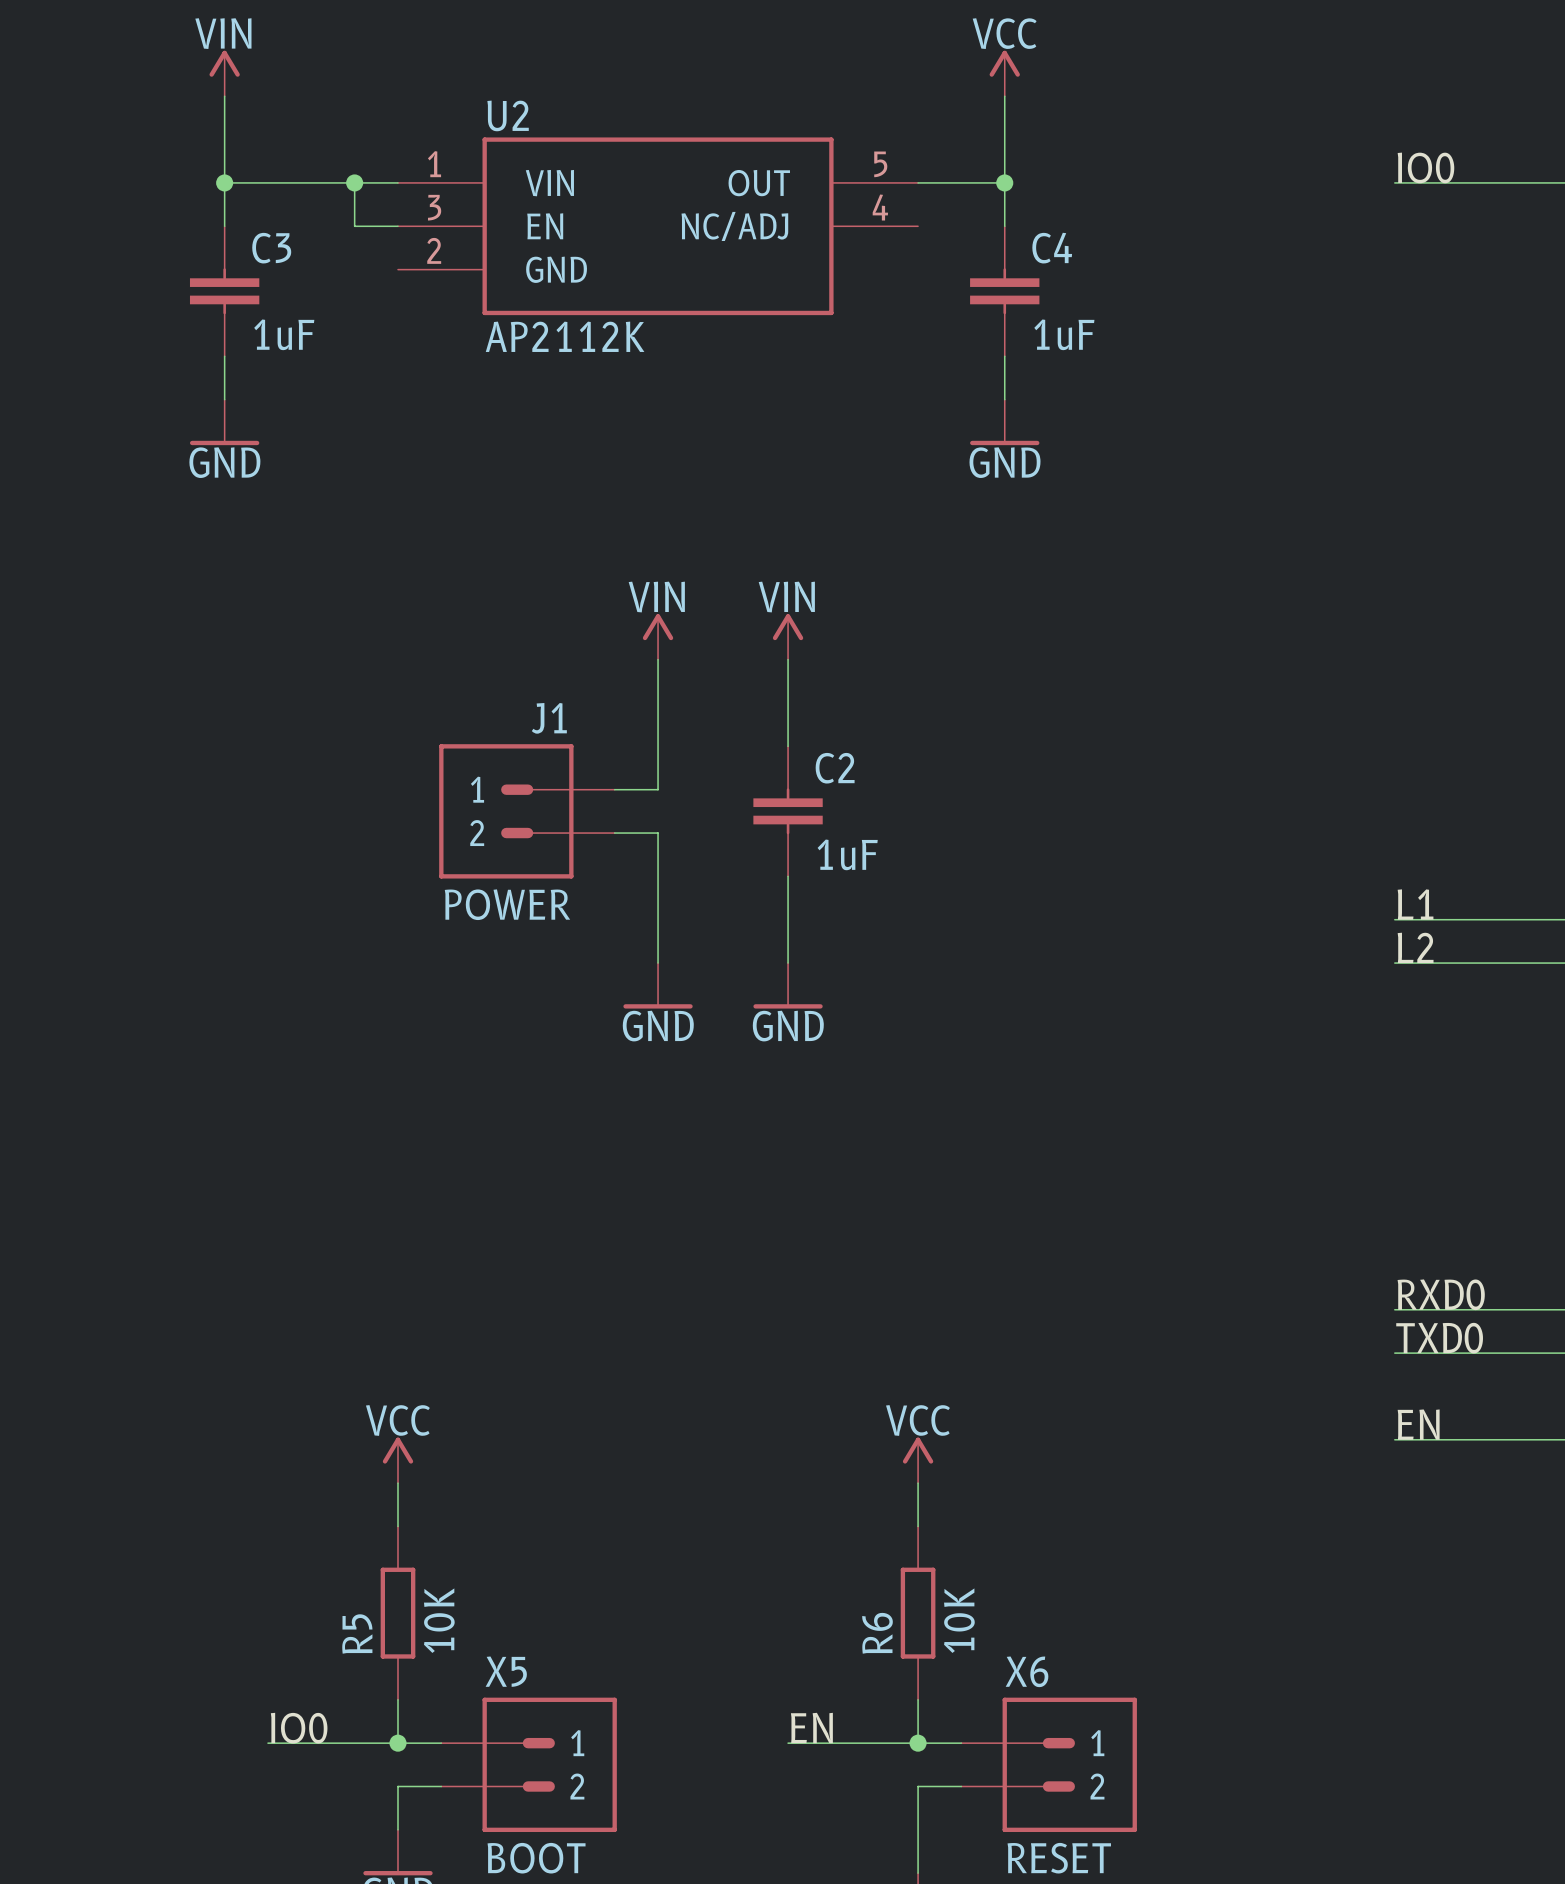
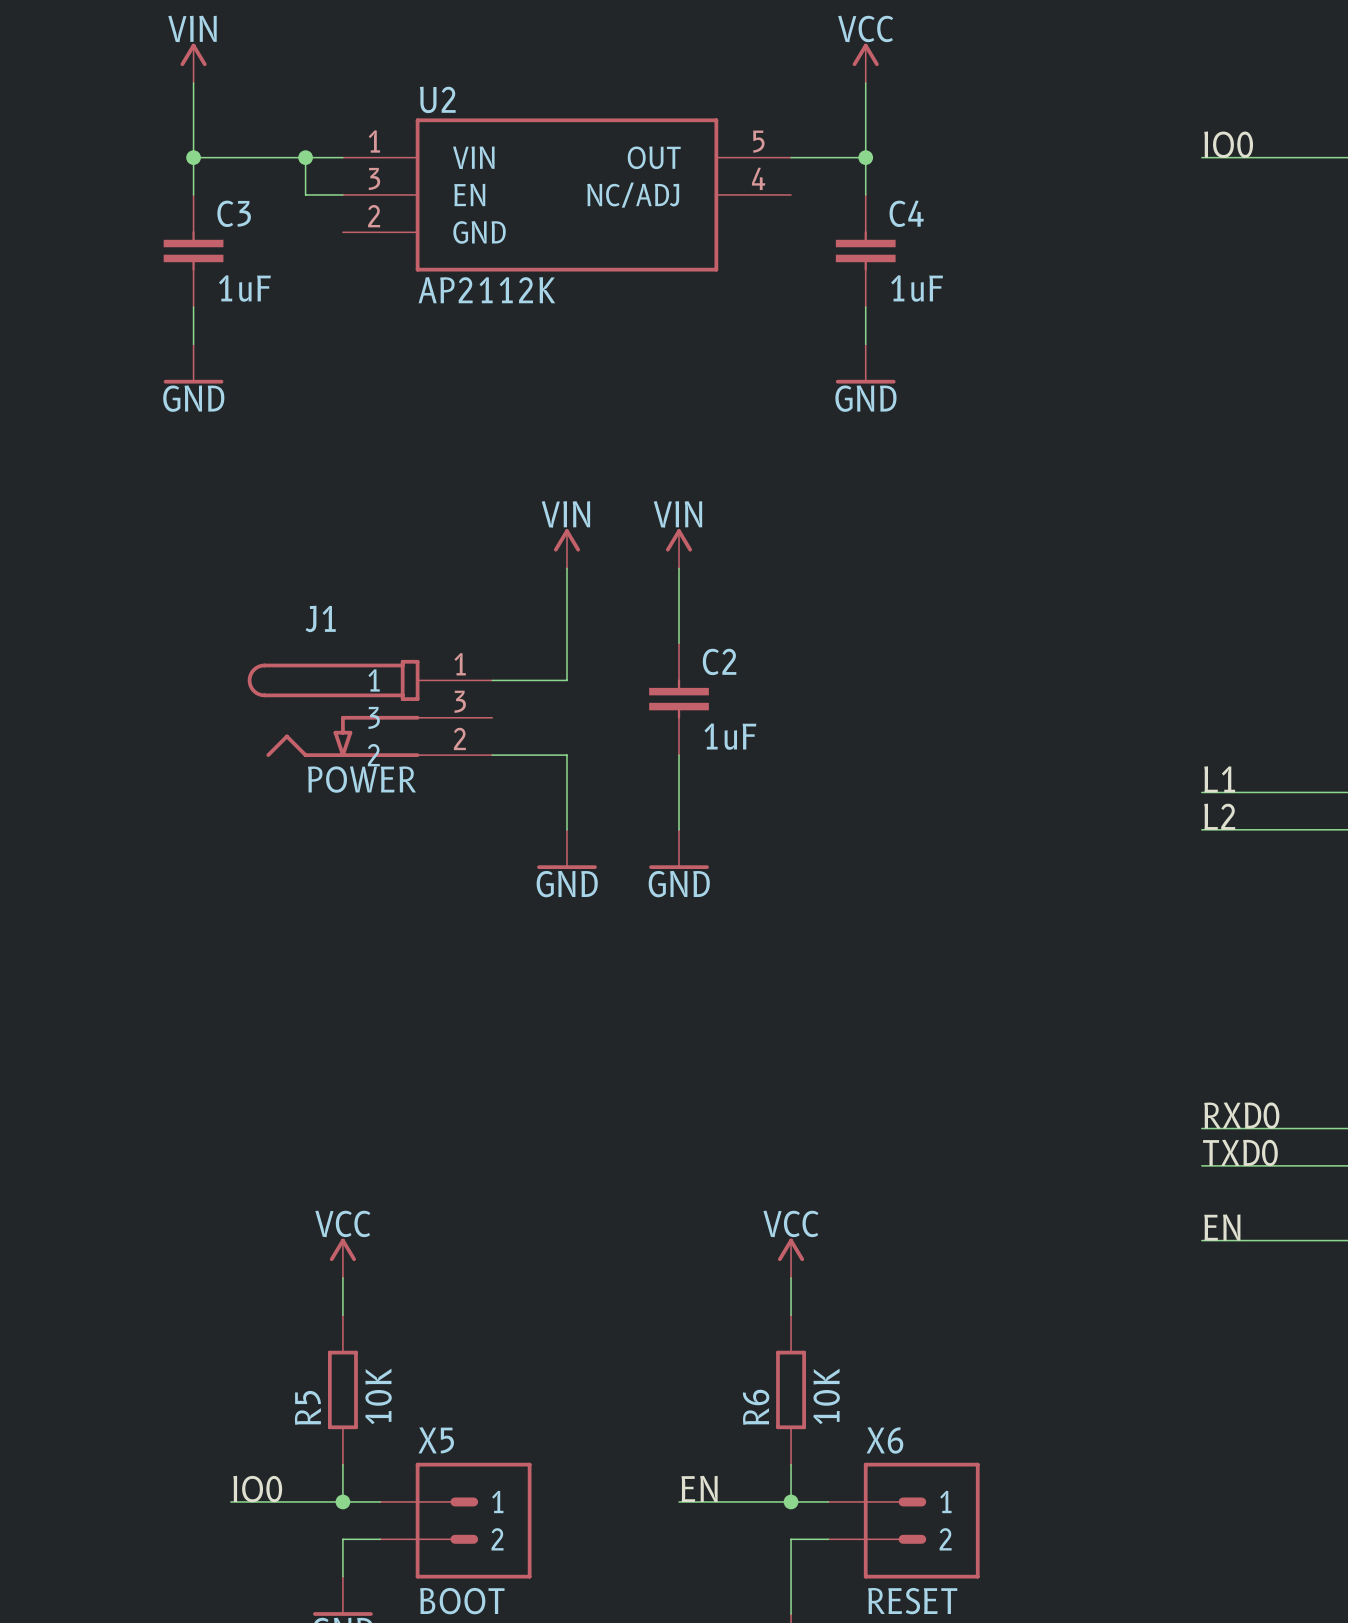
J1 name position: J1 (549, 718) -> J1 (320, 618)
J1 symbol: [439, 744, 615, 879] -> [247, 659, 493, 757]
wire: (614, 833) (658, 833) (658, 876) -> (492, 755) (566, 755)
J1 value position: POWER (507, 904) -> POWER (361, 779)

